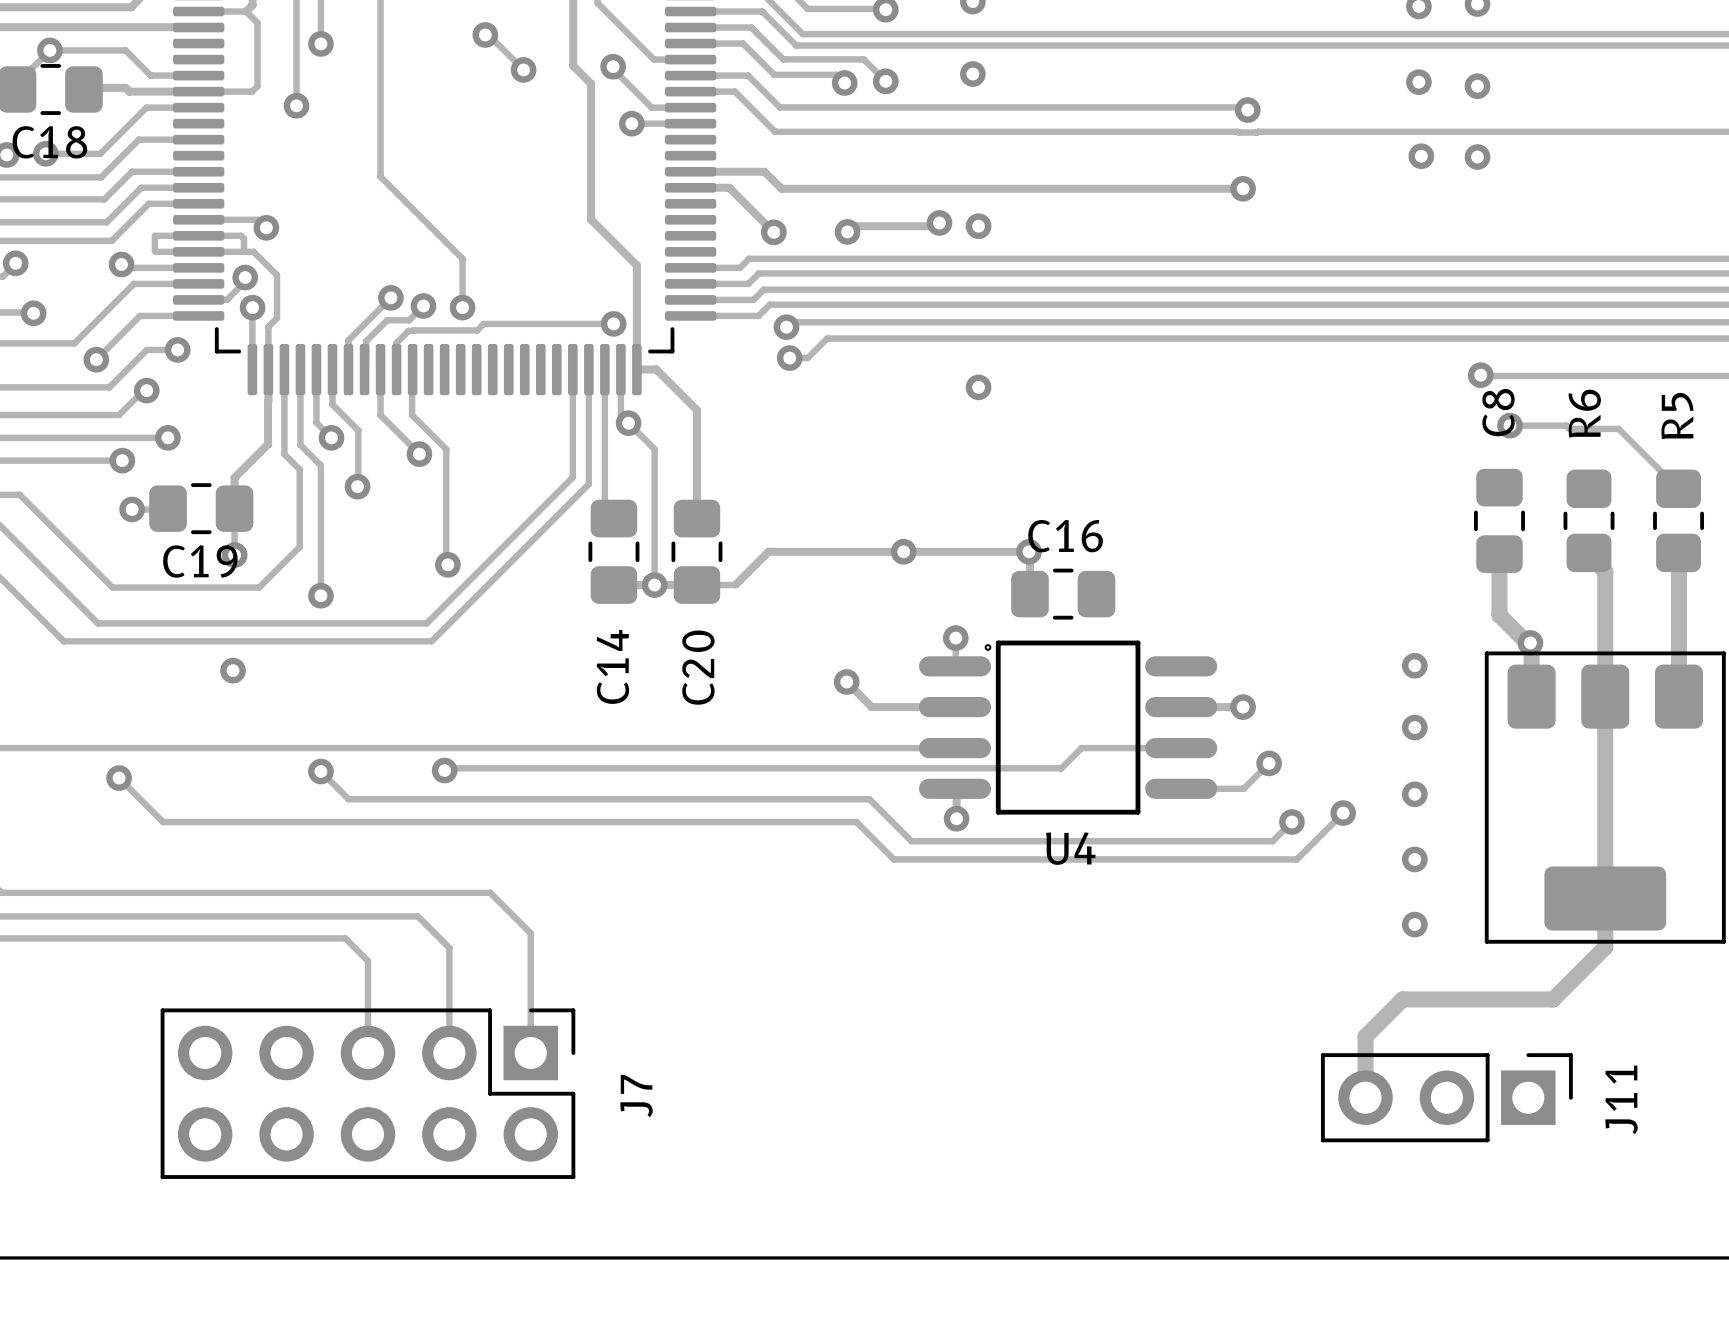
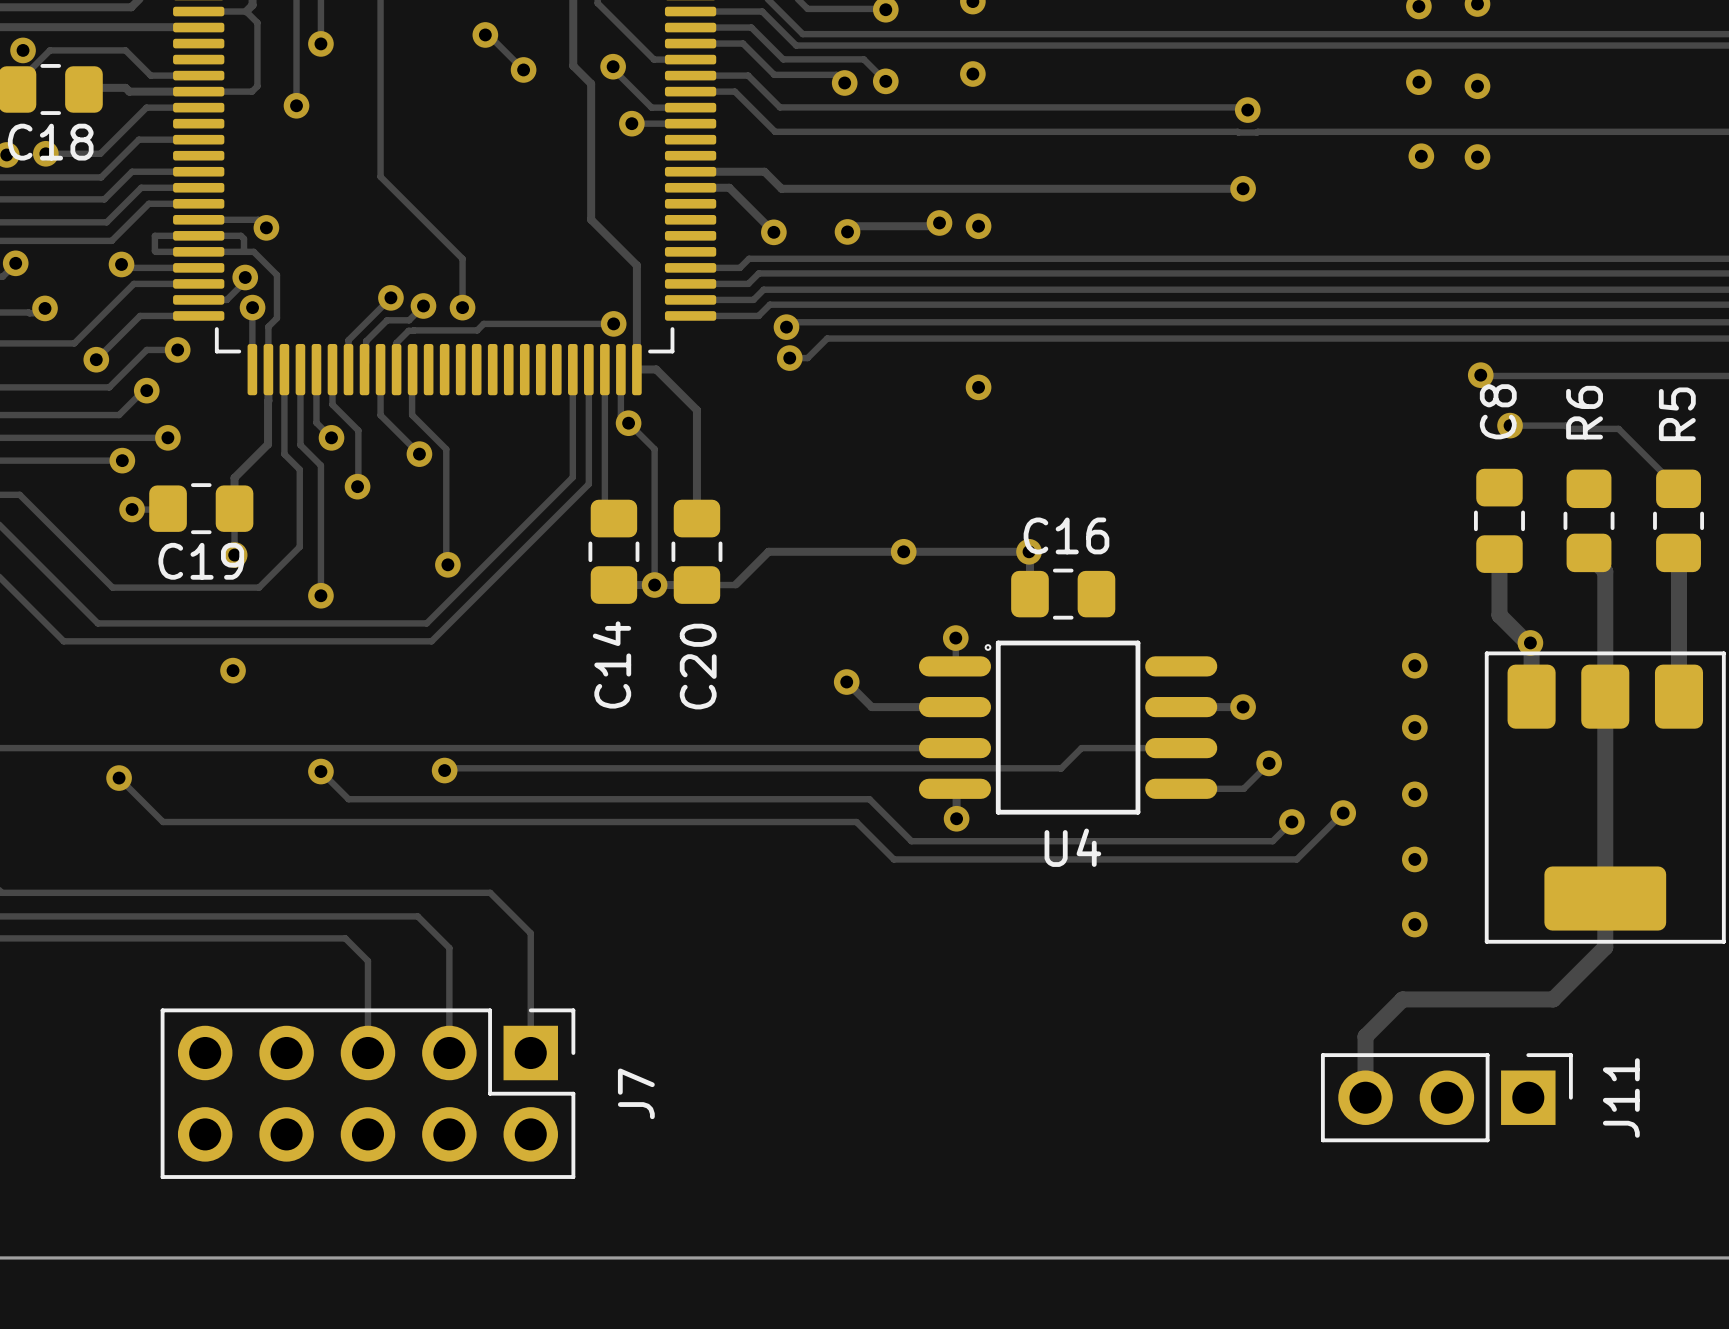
via position: (49, 50) -> (23, 50)
via position: (33, 313) -> (45, 308)

